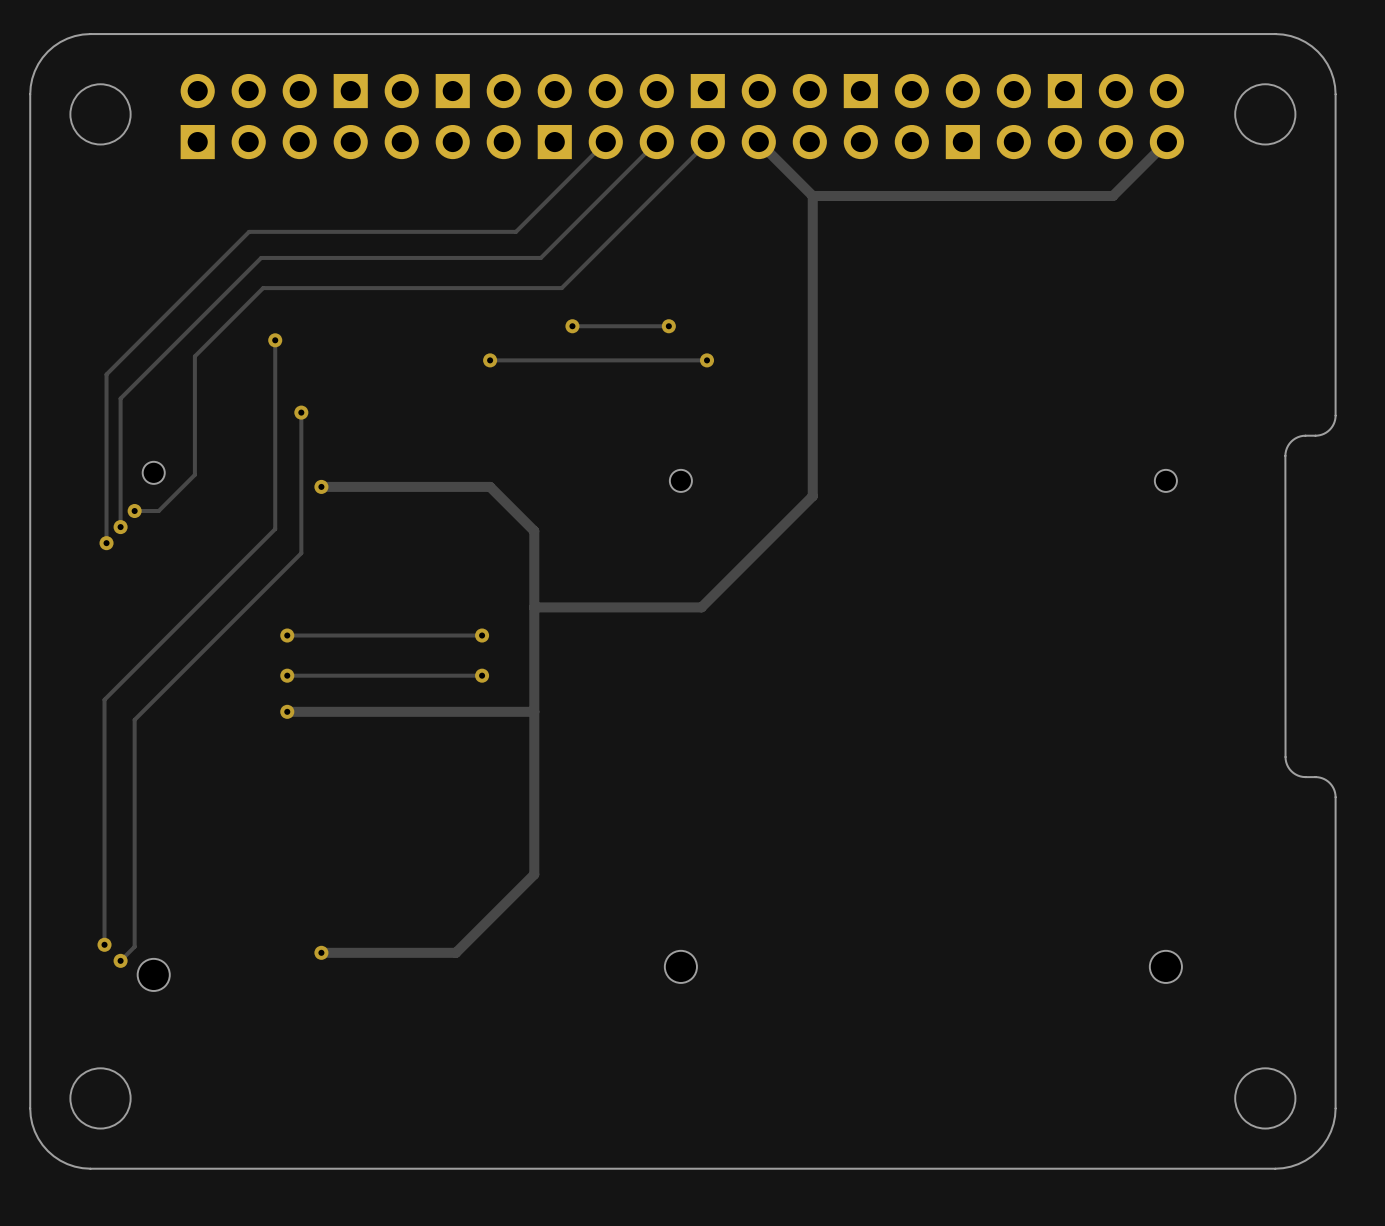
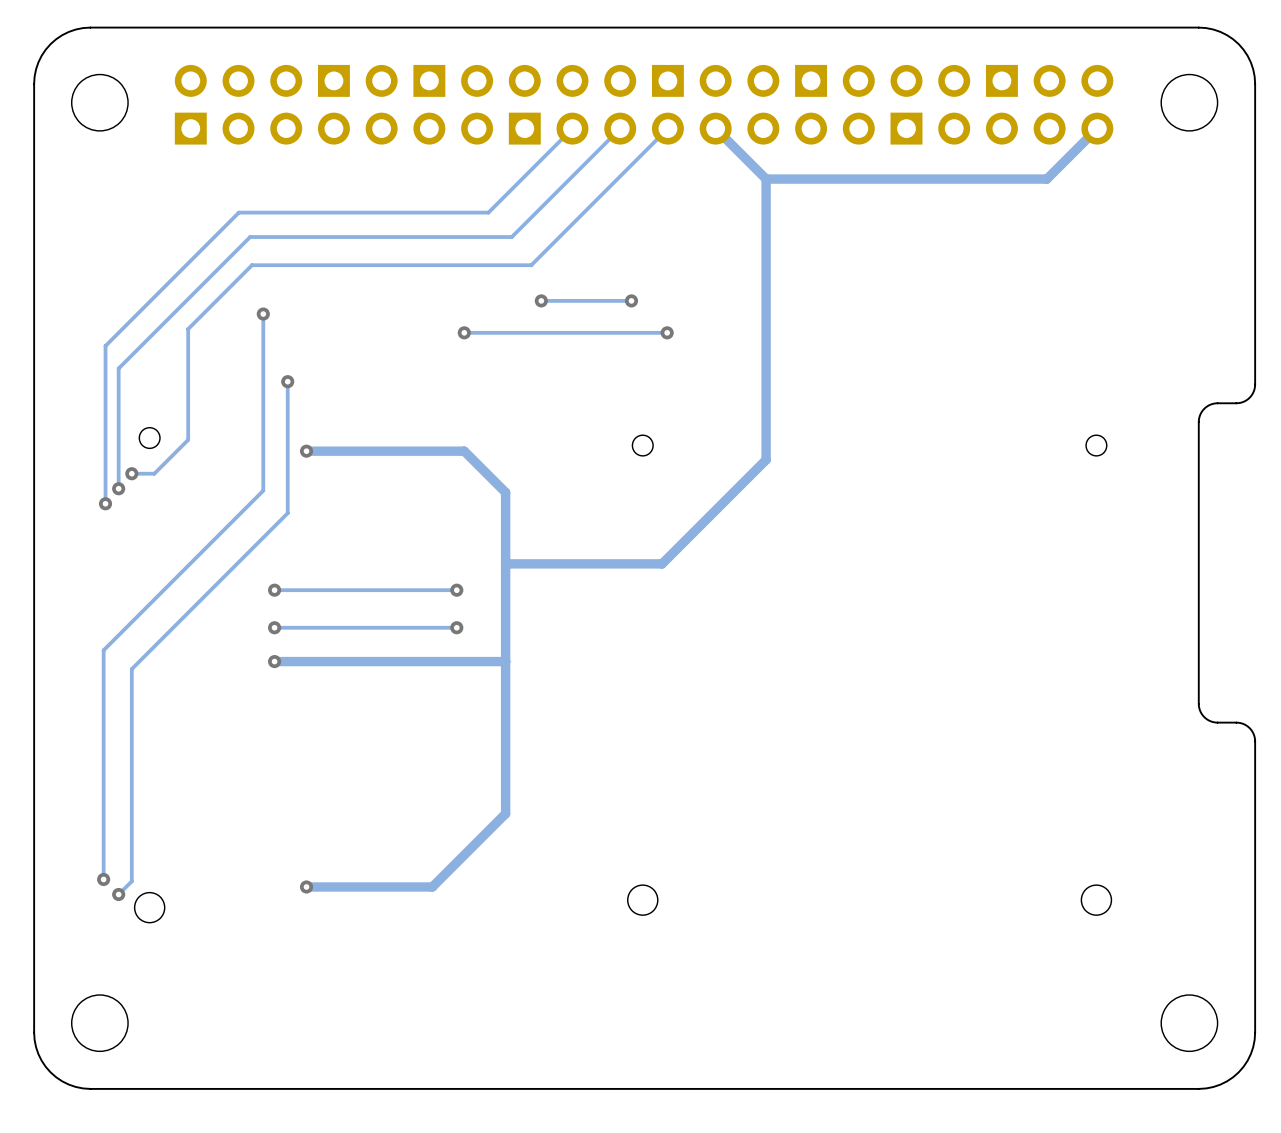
part footprint: [29, 33, 1337, 1170] -> [33, 26, 1257, 1090]

